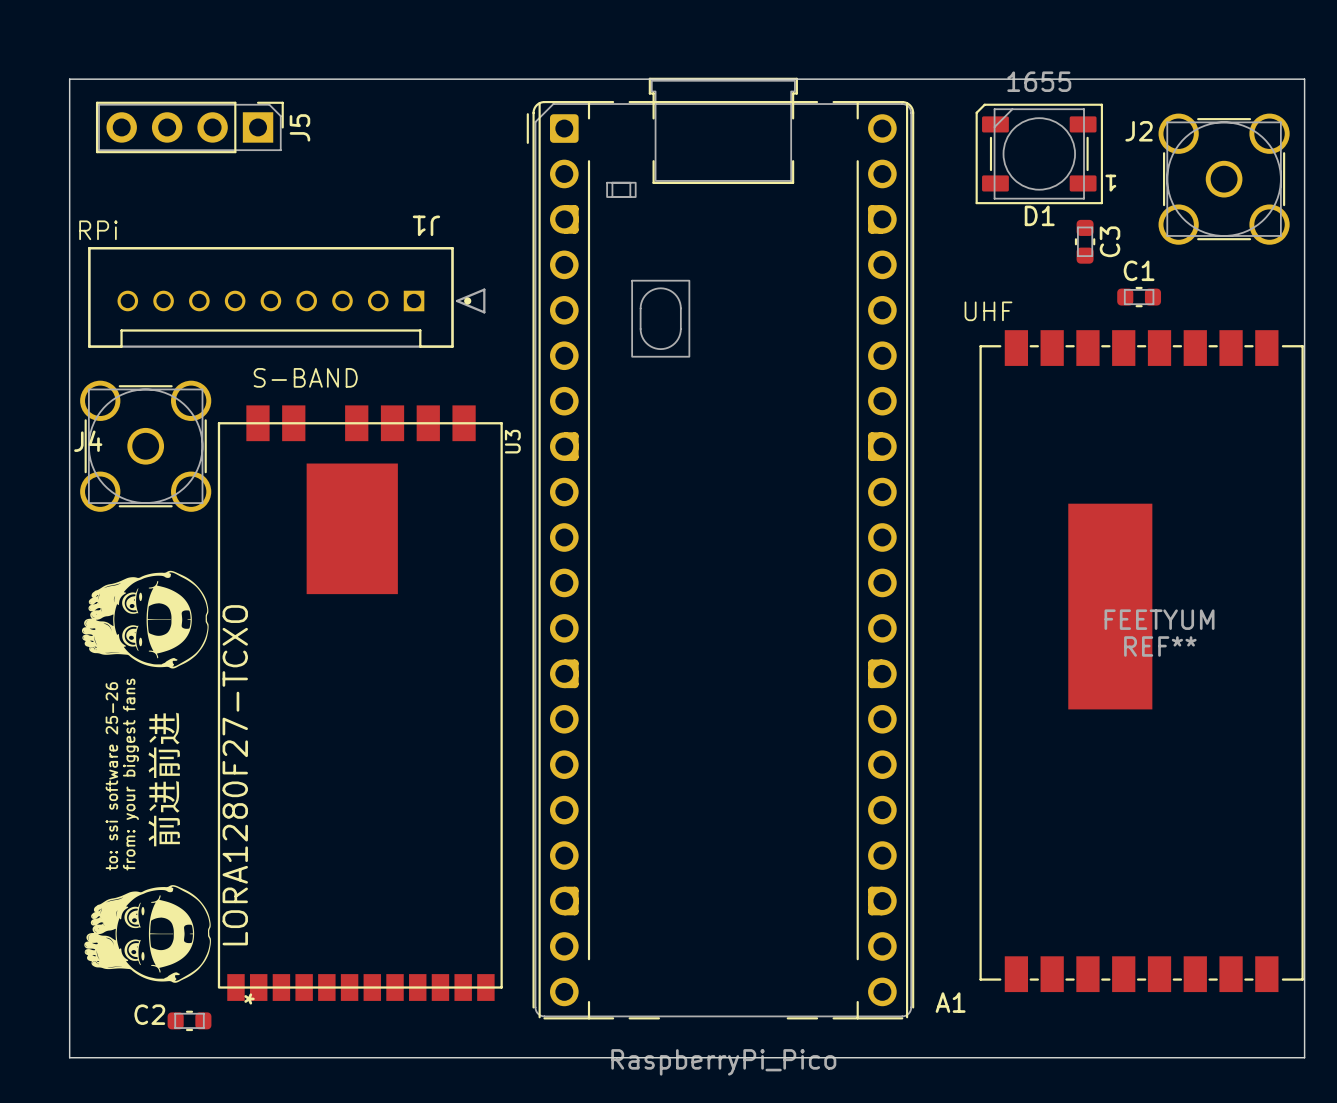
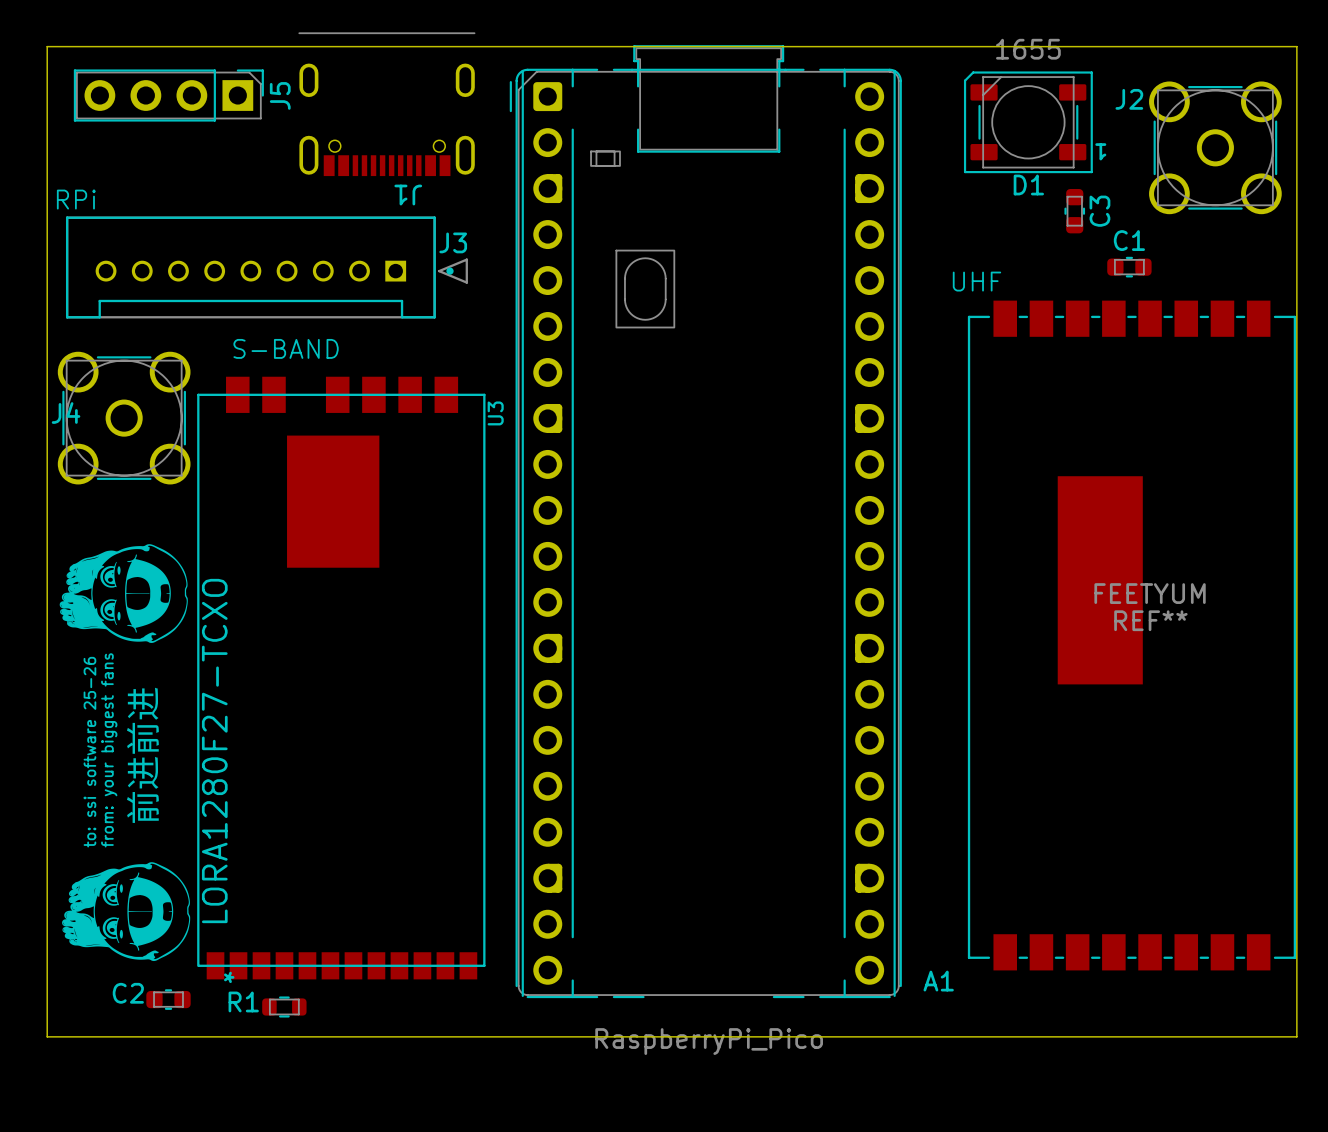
J3: none -> (386, 104)
R1: none -> (284, 1006)

